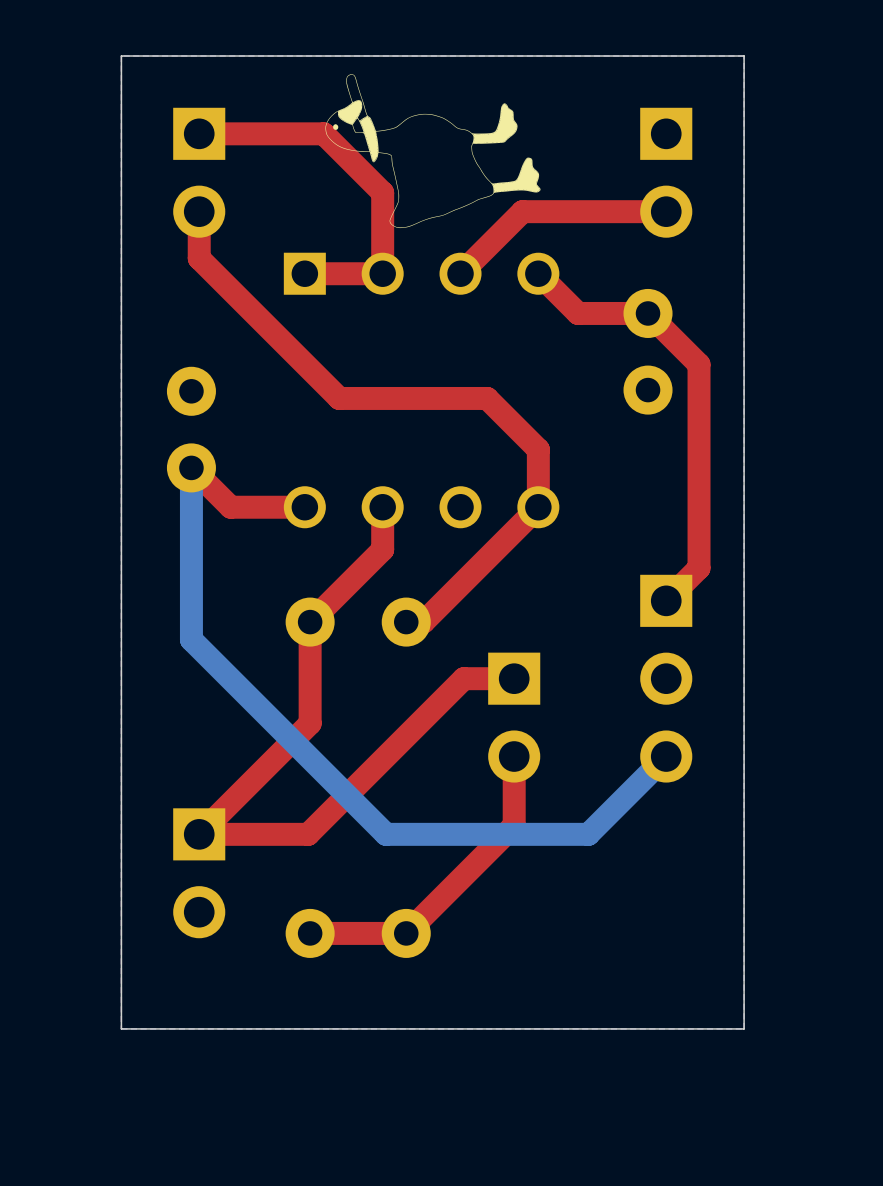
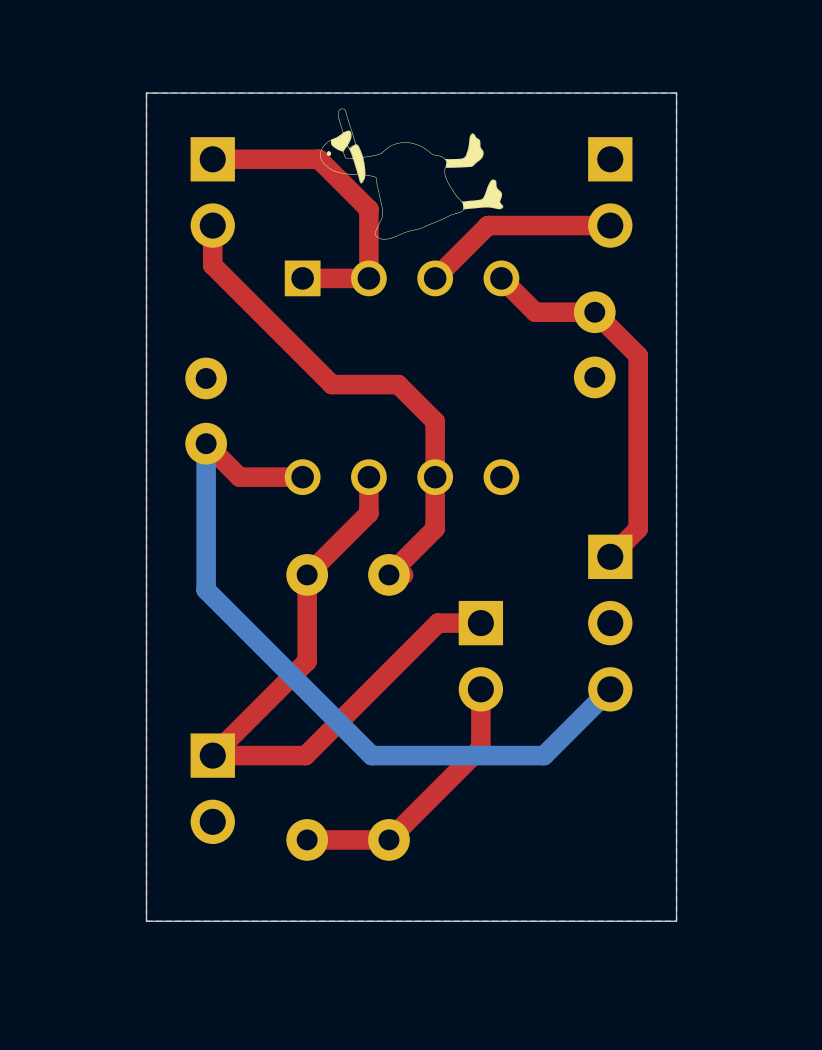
top track: (417, 398) (487, 398) (538, 449) (538, 507) (423, 622) -> (398, 384) (435, 421) (435, 528) (388, 574)

